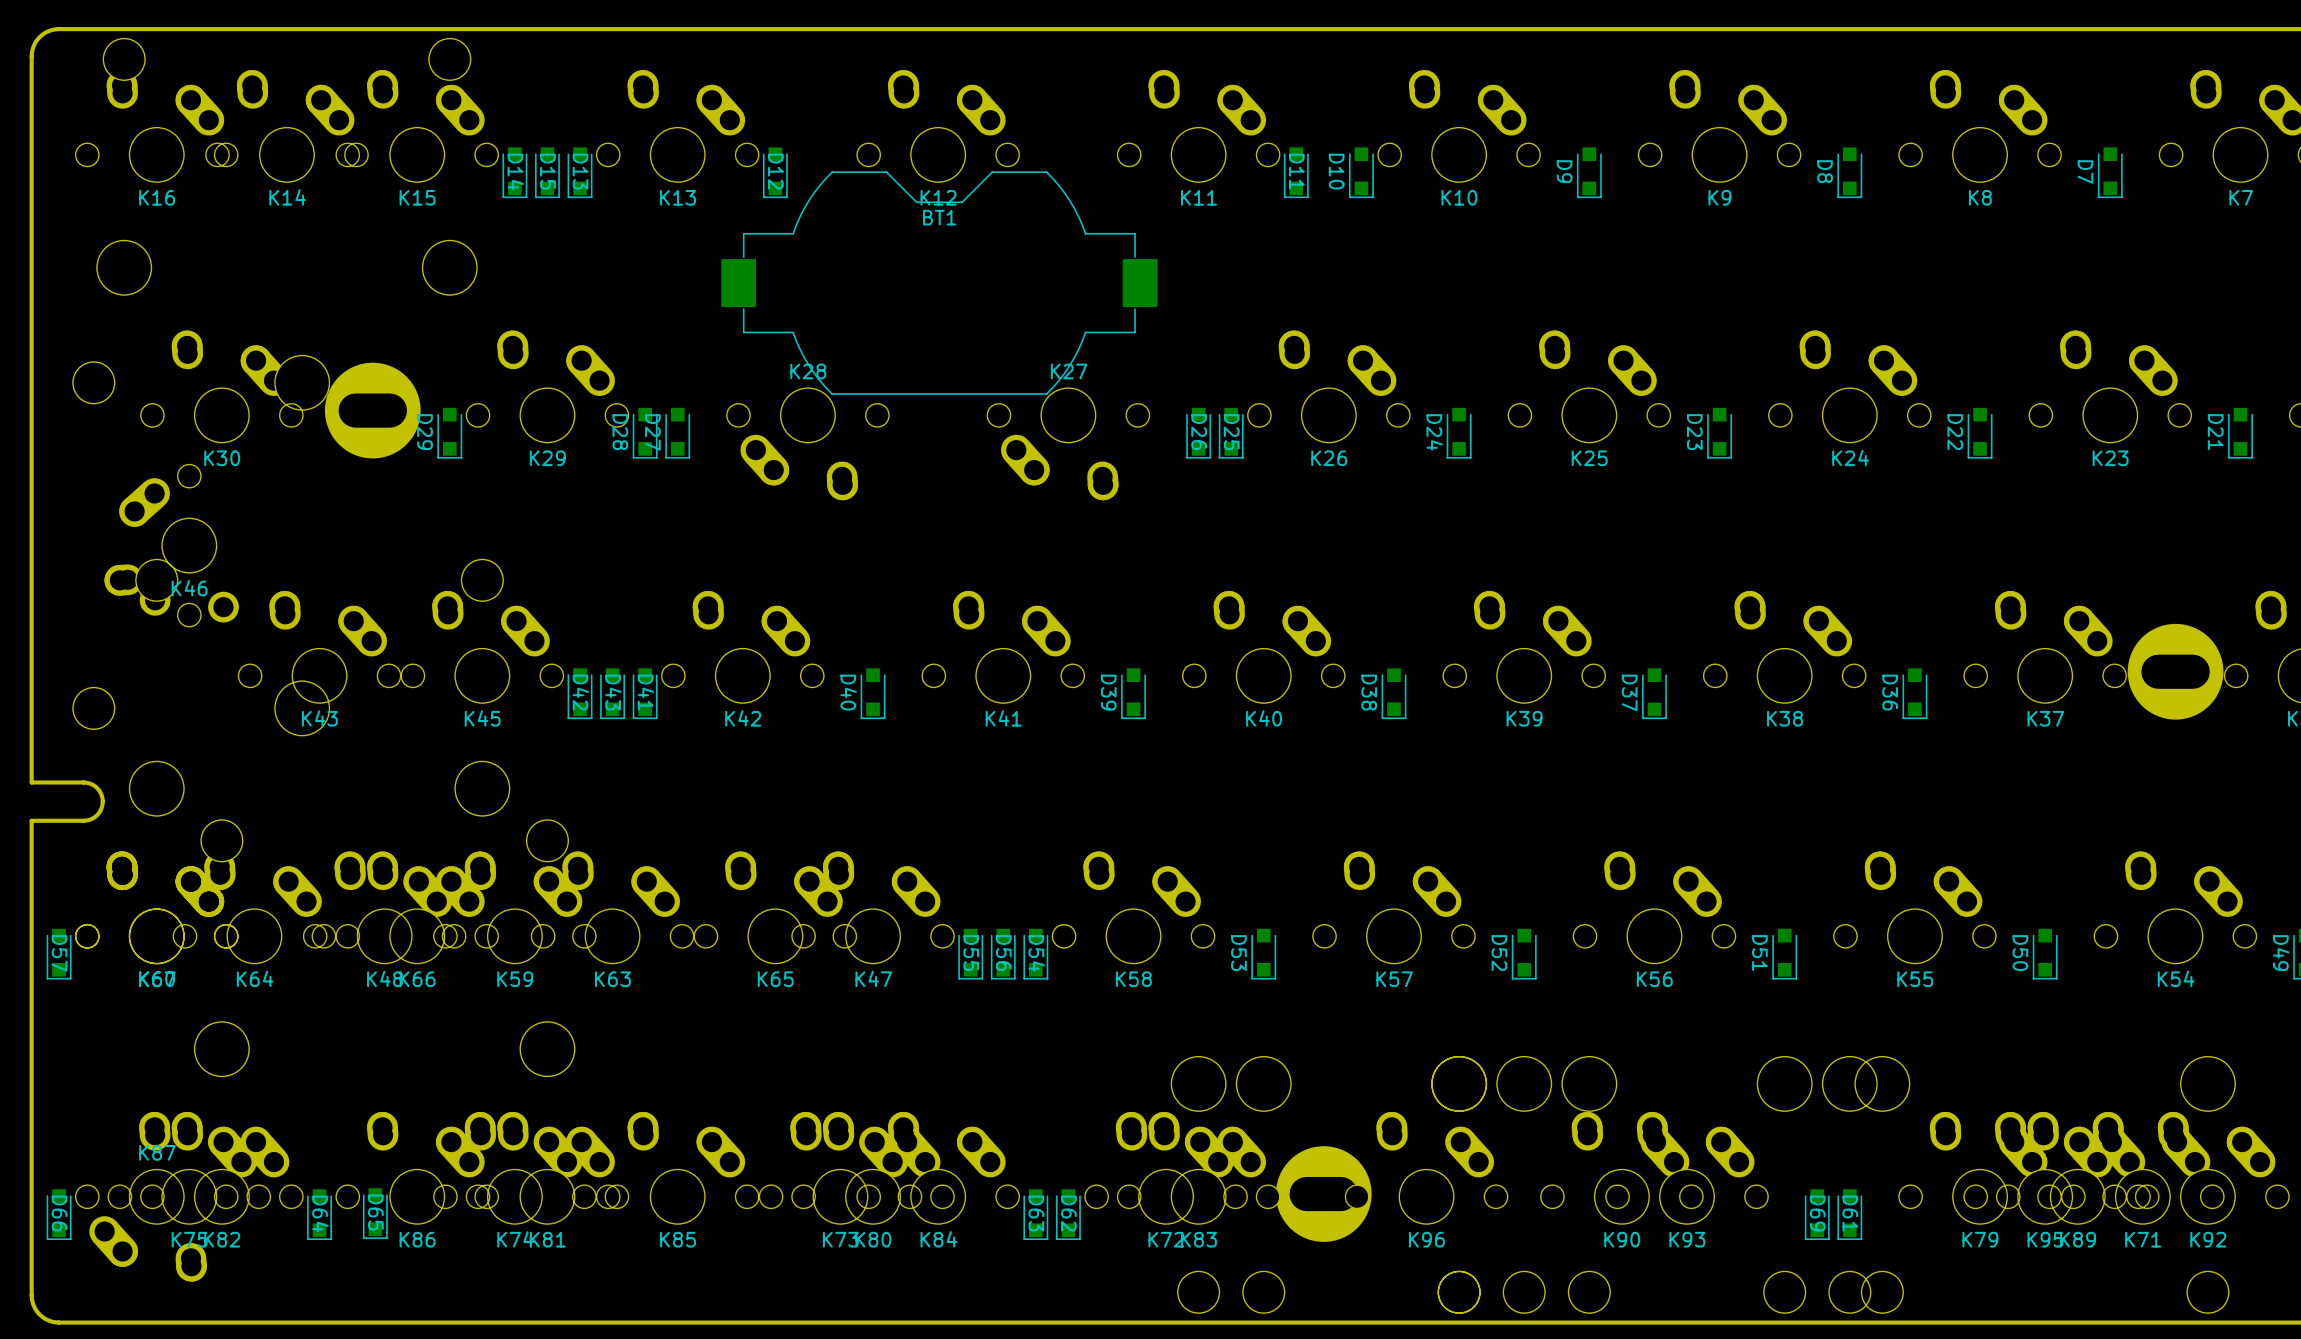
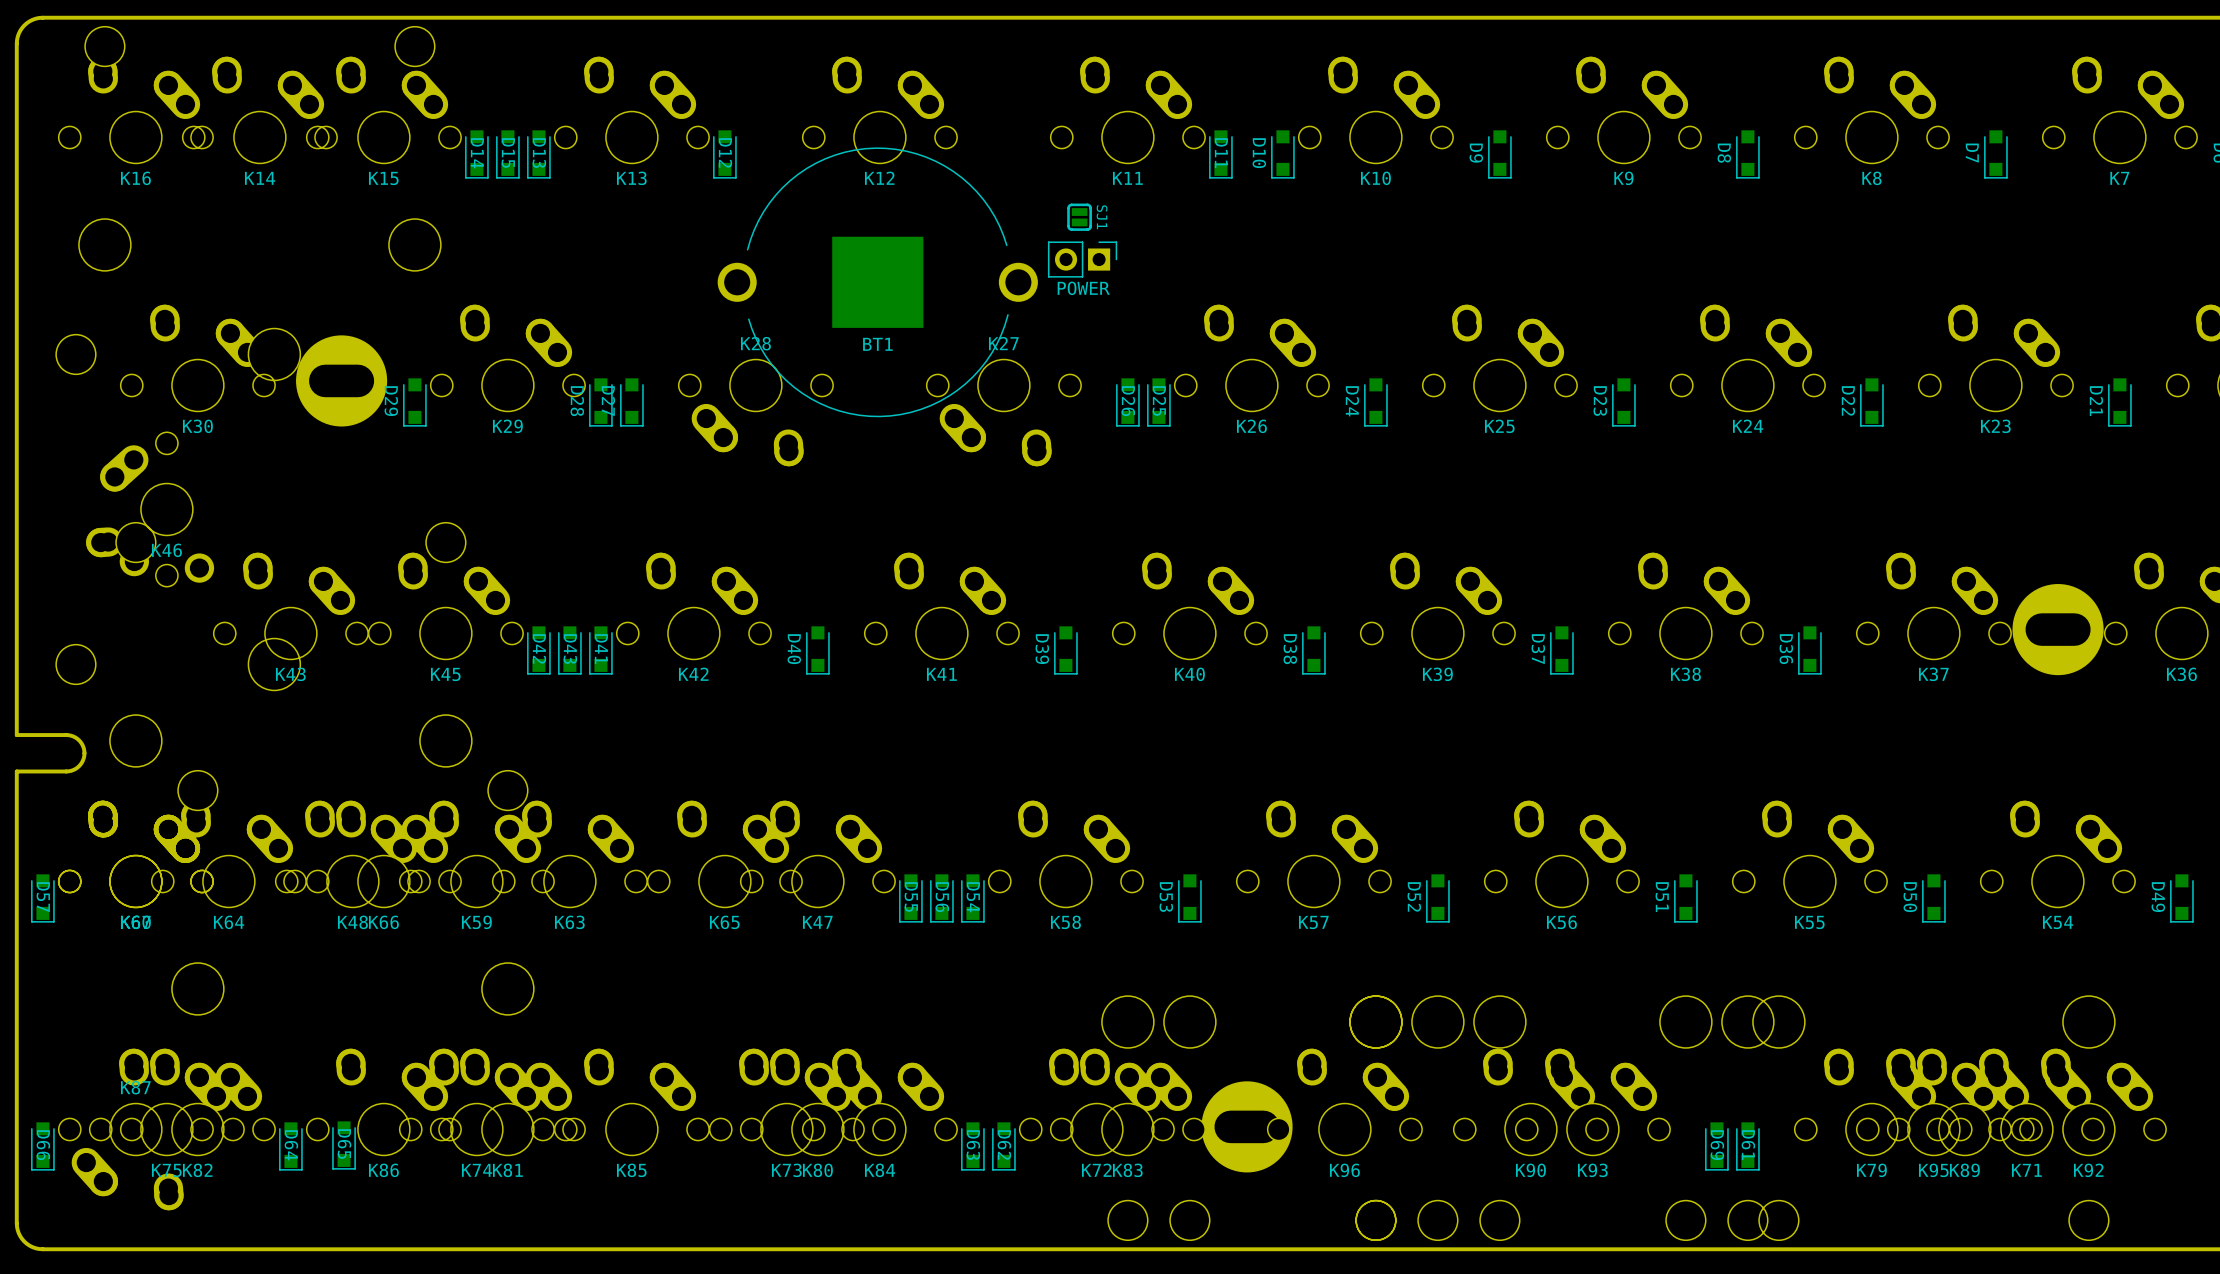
BT1 footprint: [721, 171, 1158, 395] -> [717, 147, 1038, 418]
BT1 name position: BT1 (939, 217) -> BT1 (877, 344)
SJ1: none -> (1079, 217)
part: none -> POWER (1082, 259)

